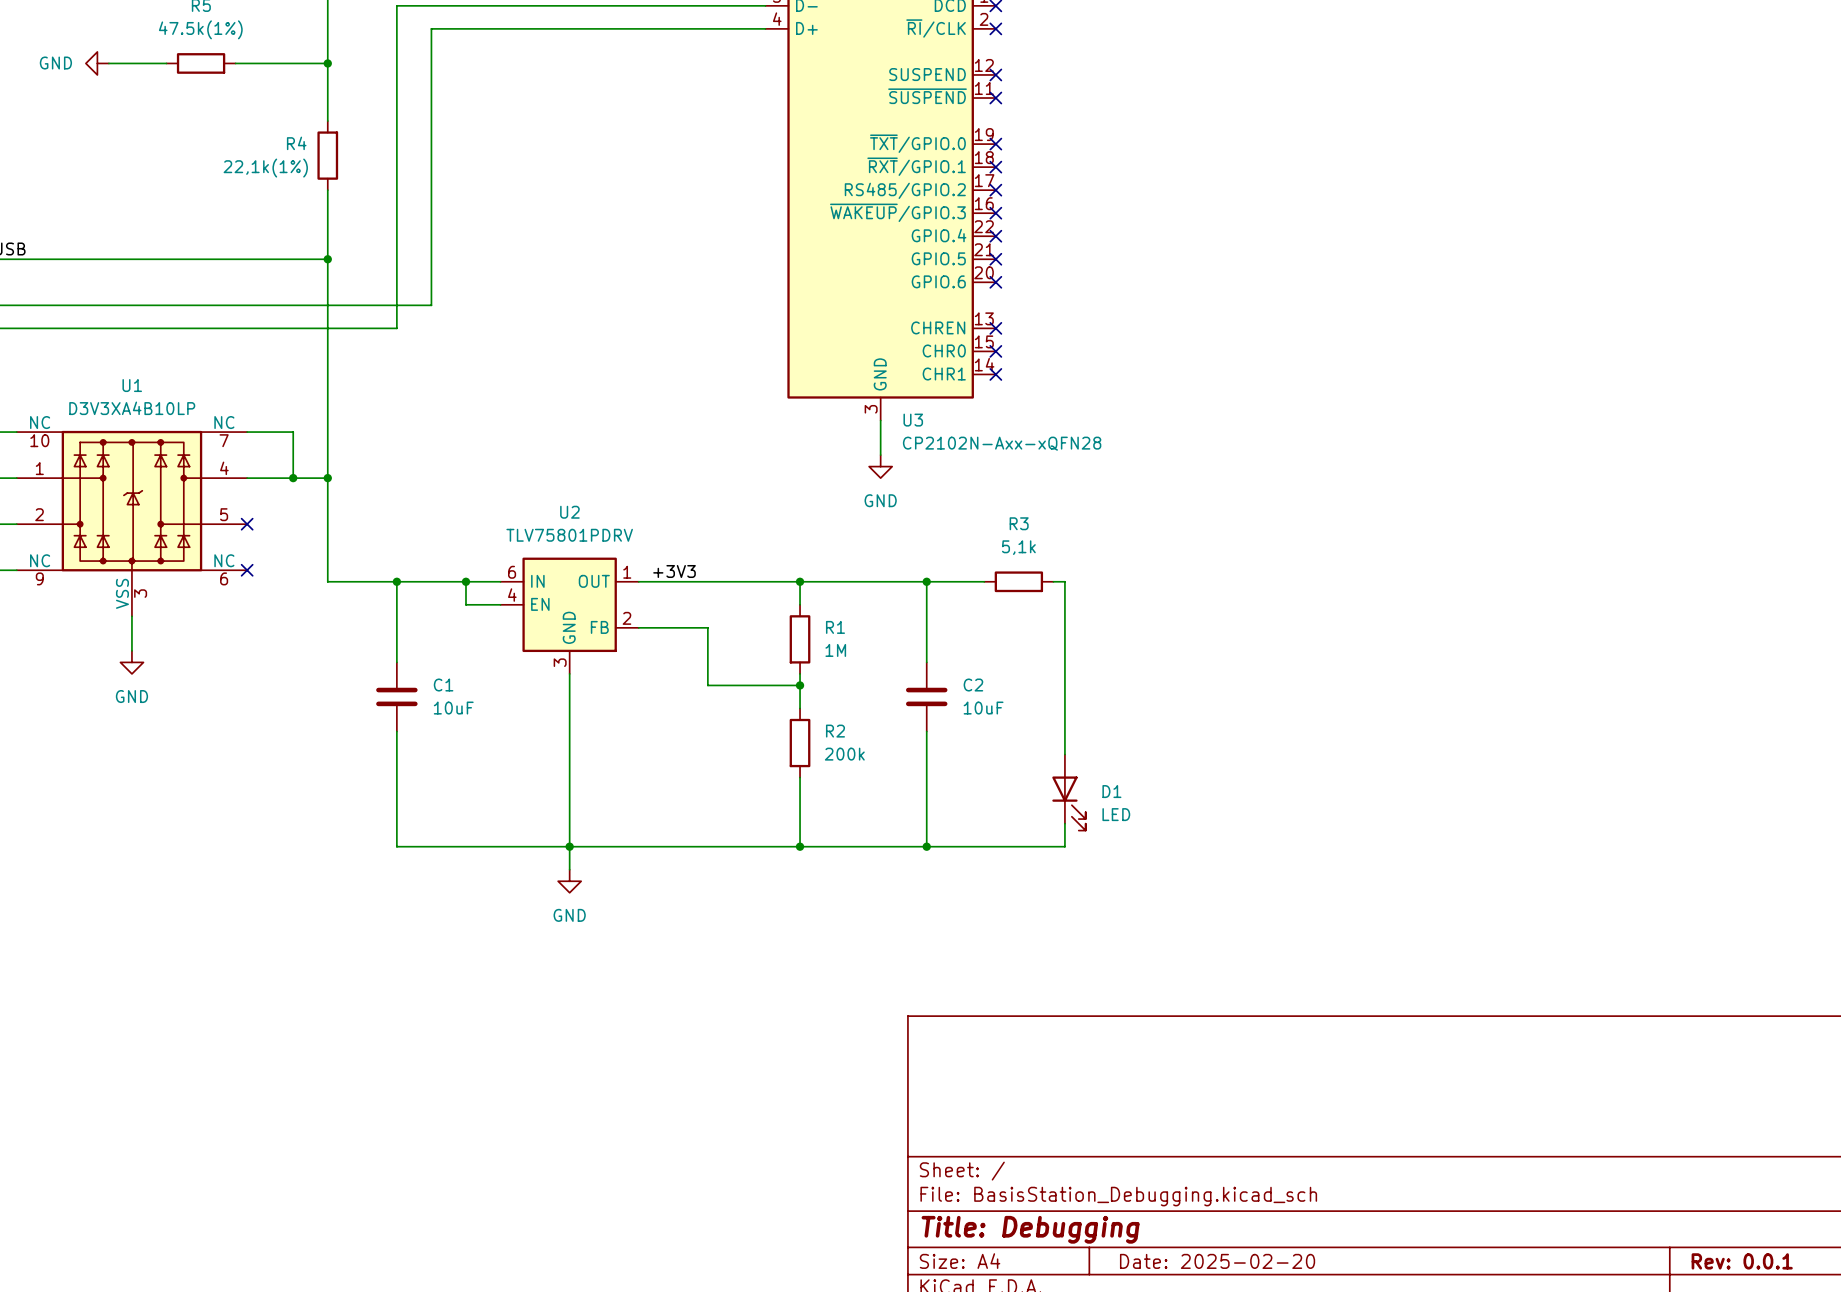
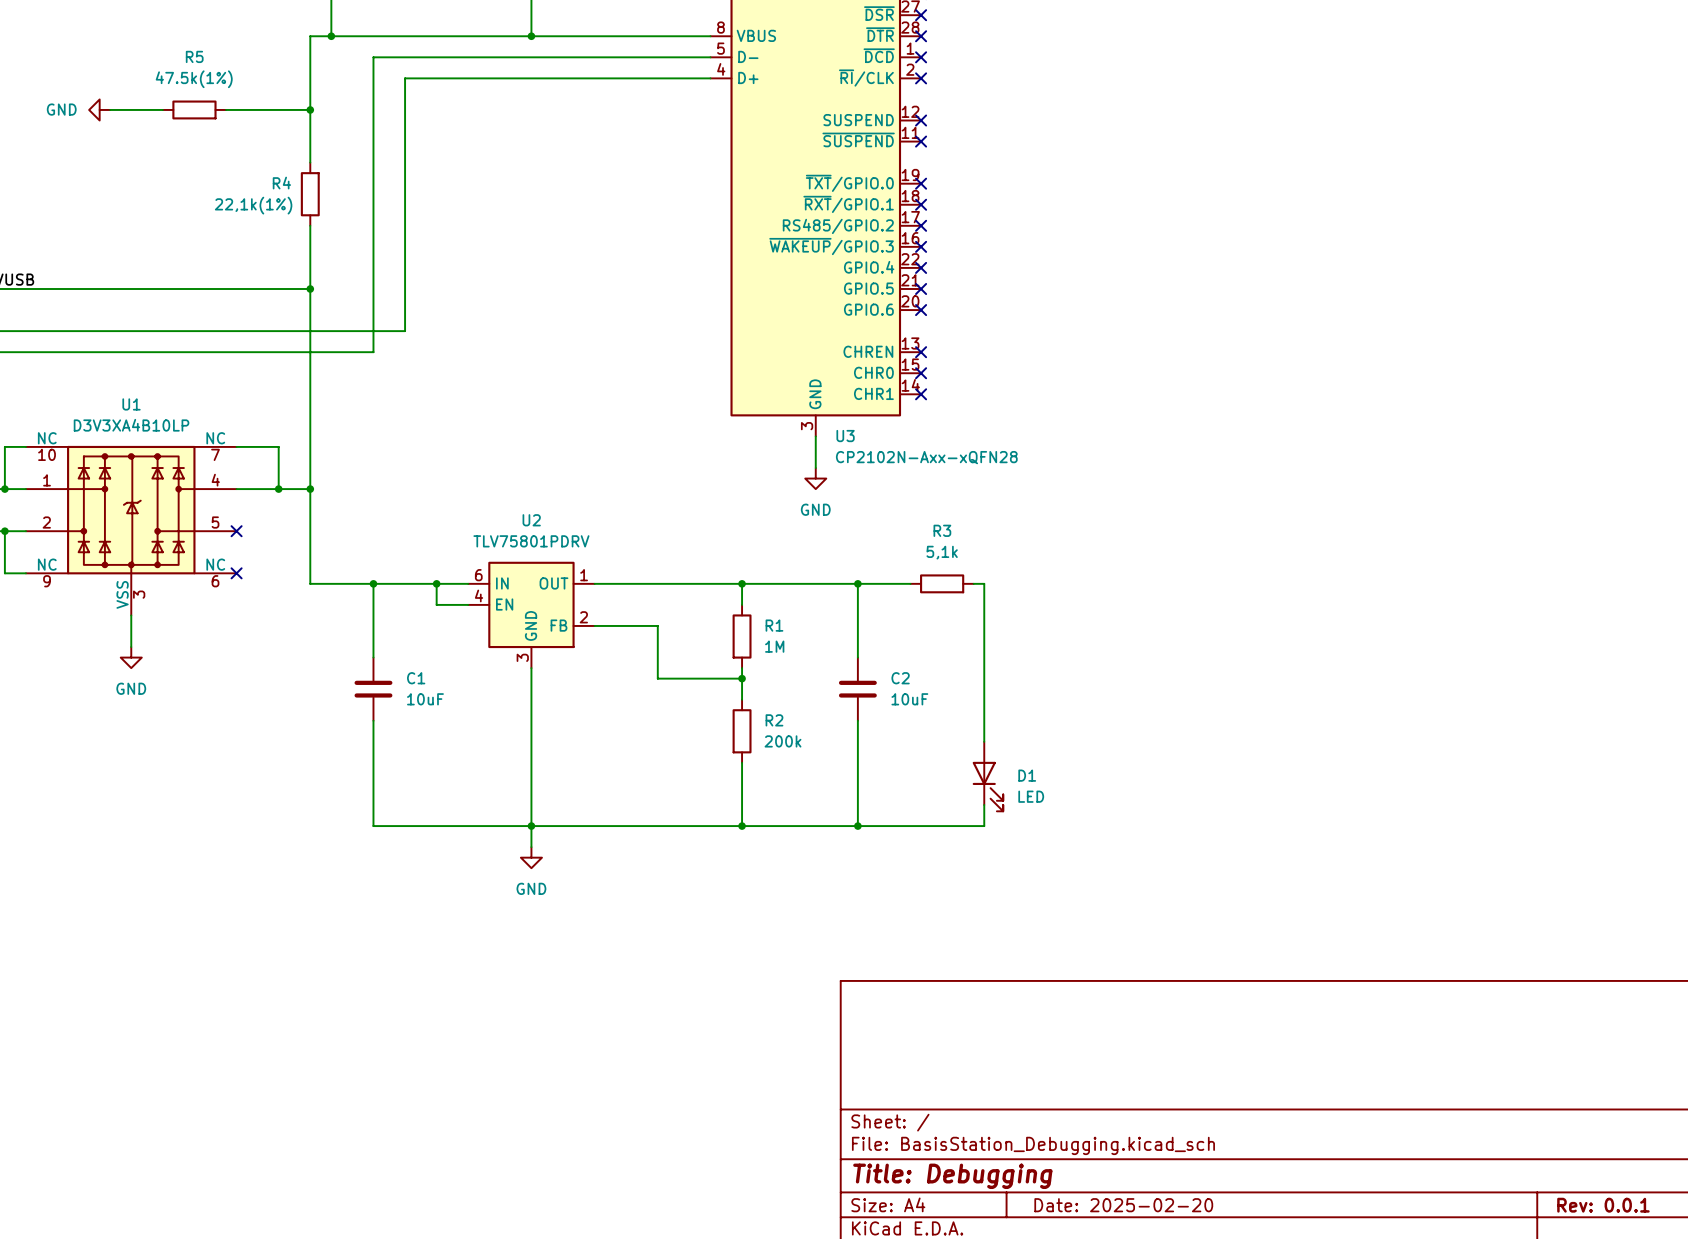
label: +3V3 (674, 571) -> none

